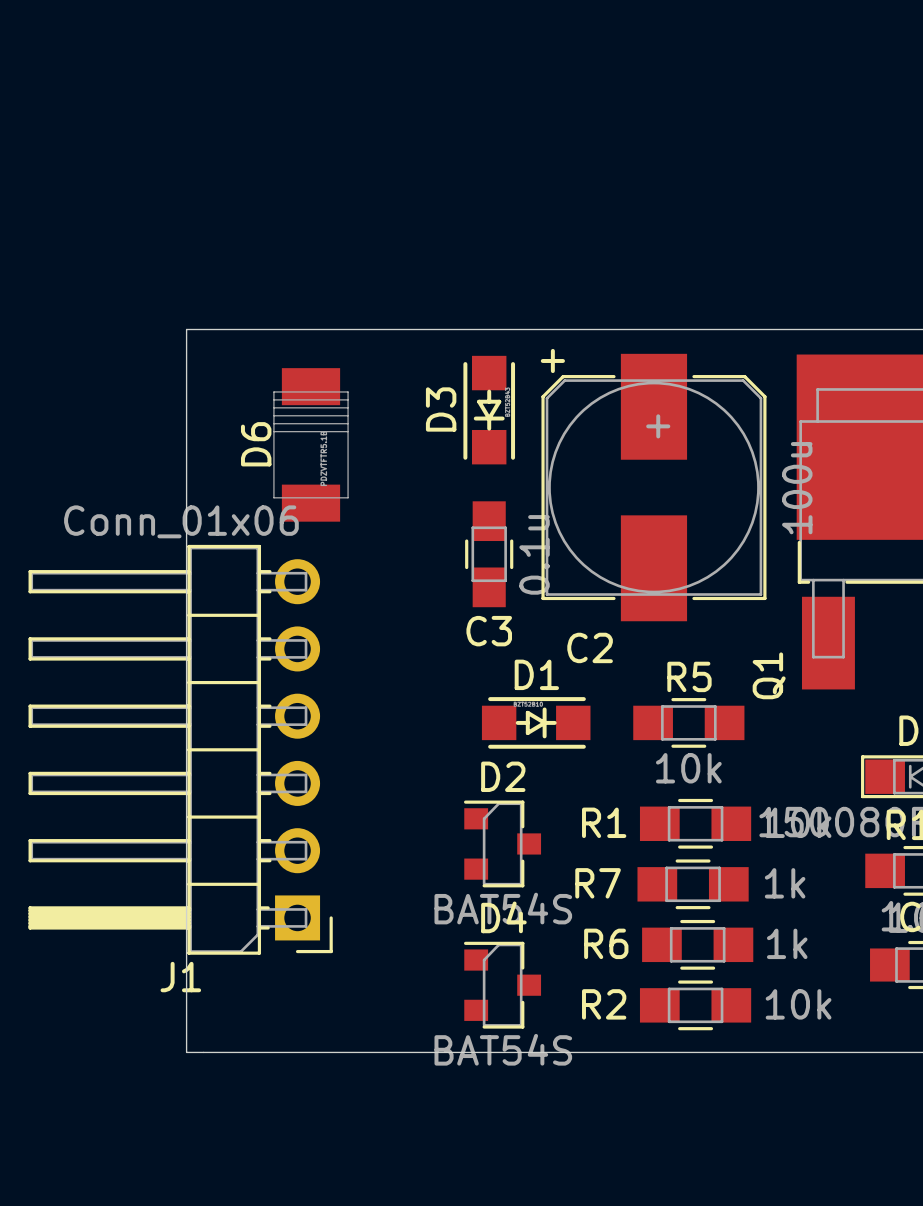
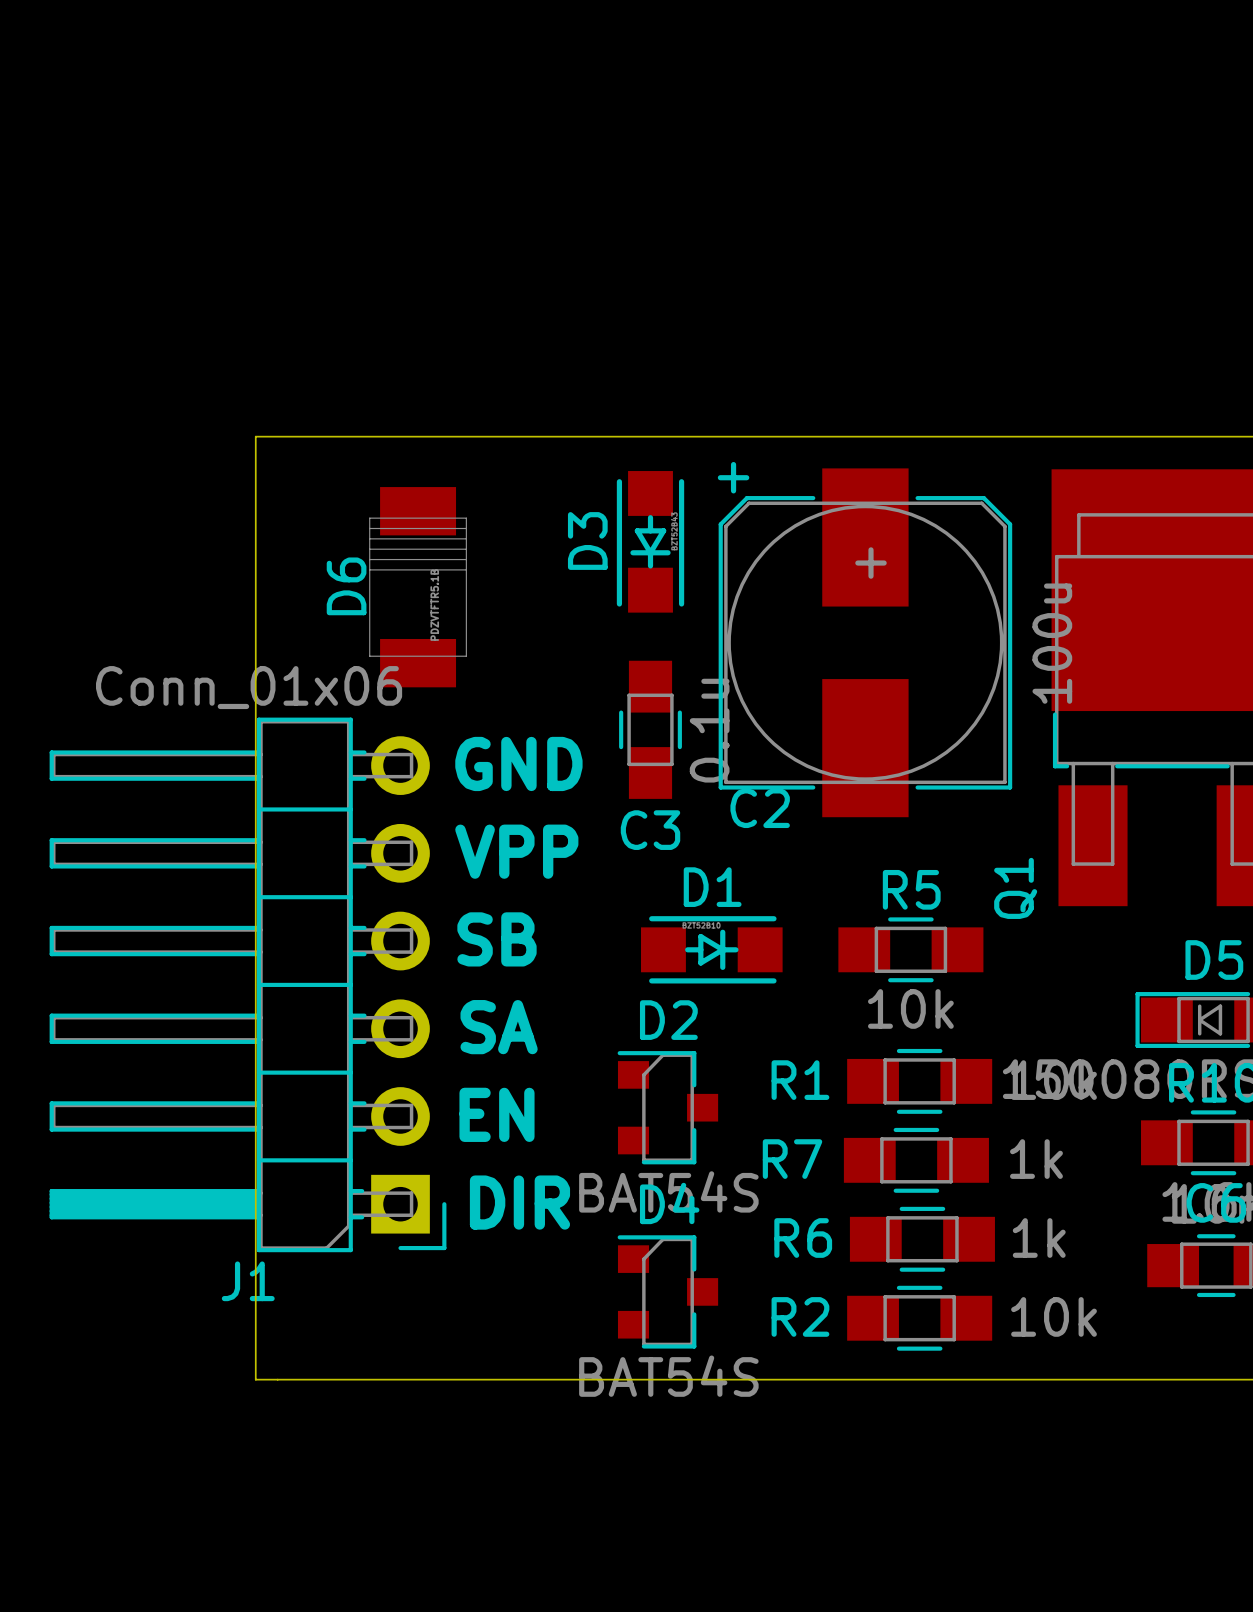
text: none -> GND (518, 763)
text: none -> VPP (516, 851)
C2 name position: C2 (590, 647) -> C2 (760, 808)
text: none -> SB (496, 939)
text: none -> SA (499, 1027)
text: none -> EN (496, 1114)
text: none -> DIR (519, 1202)

